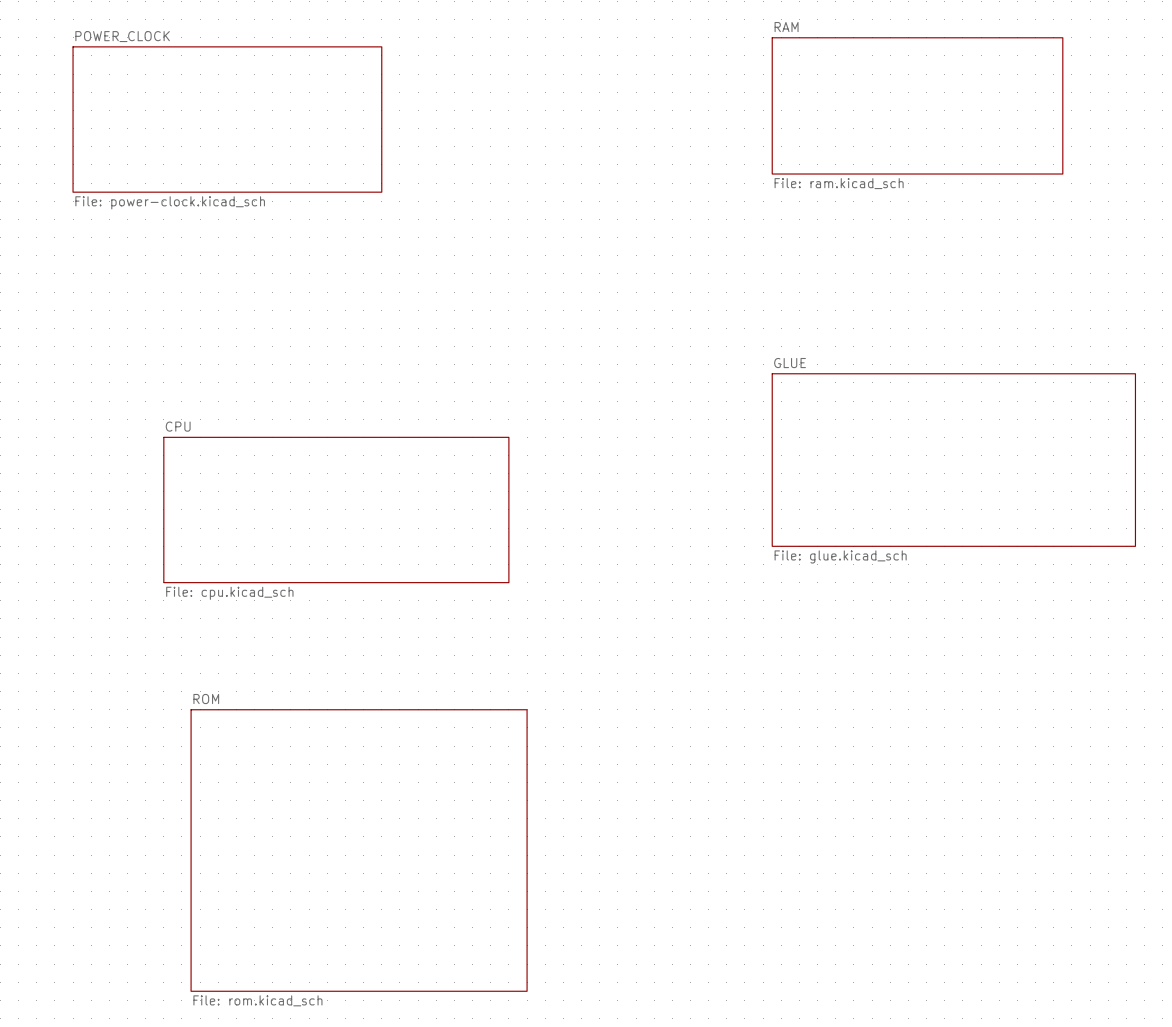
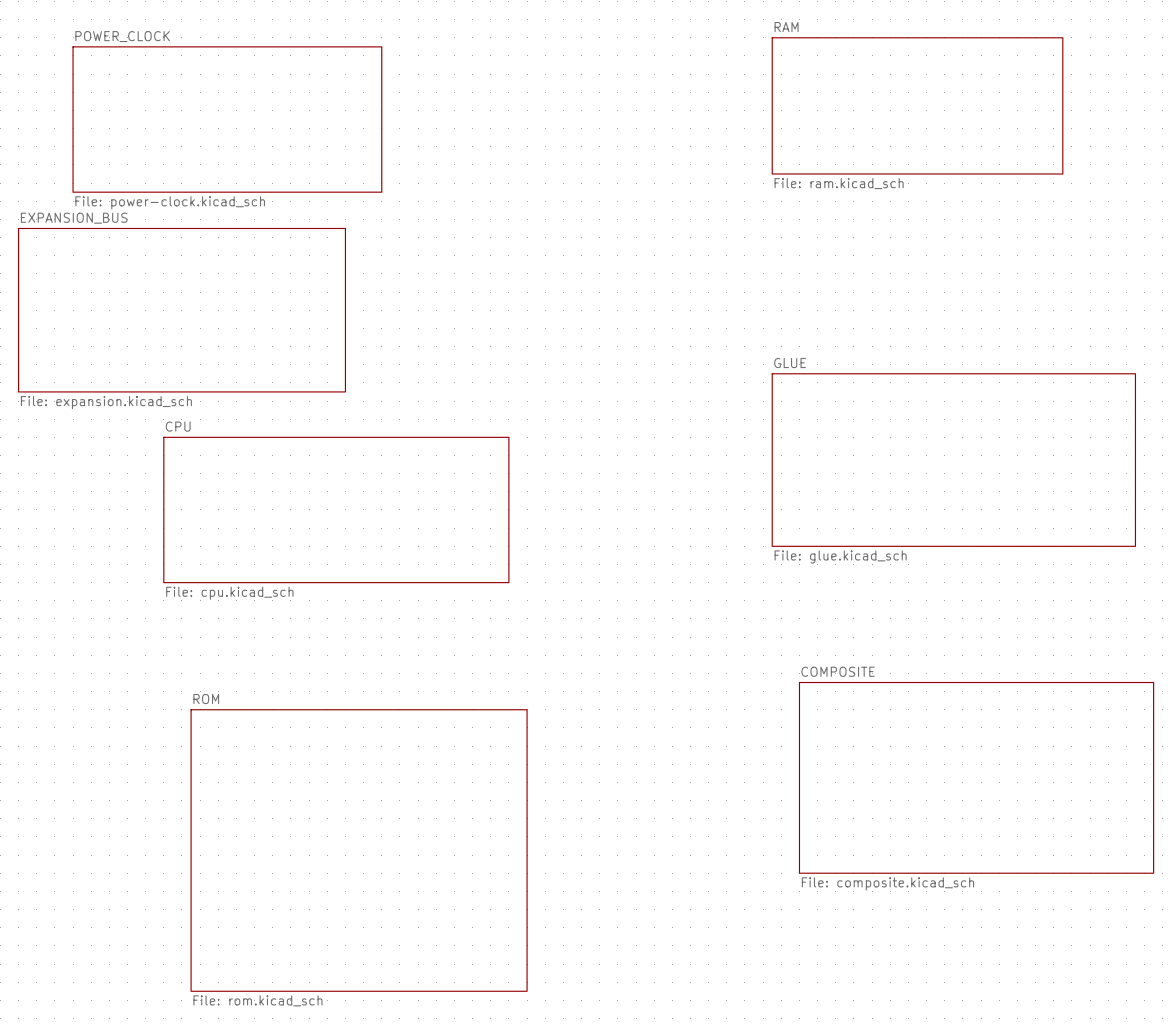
sheet EXPANSION_BUS: none -> File: expansion.kicad_sch (181, 310)
sheet COMPOSITE: none -> File: composite.kicad_sch (976, 777)

